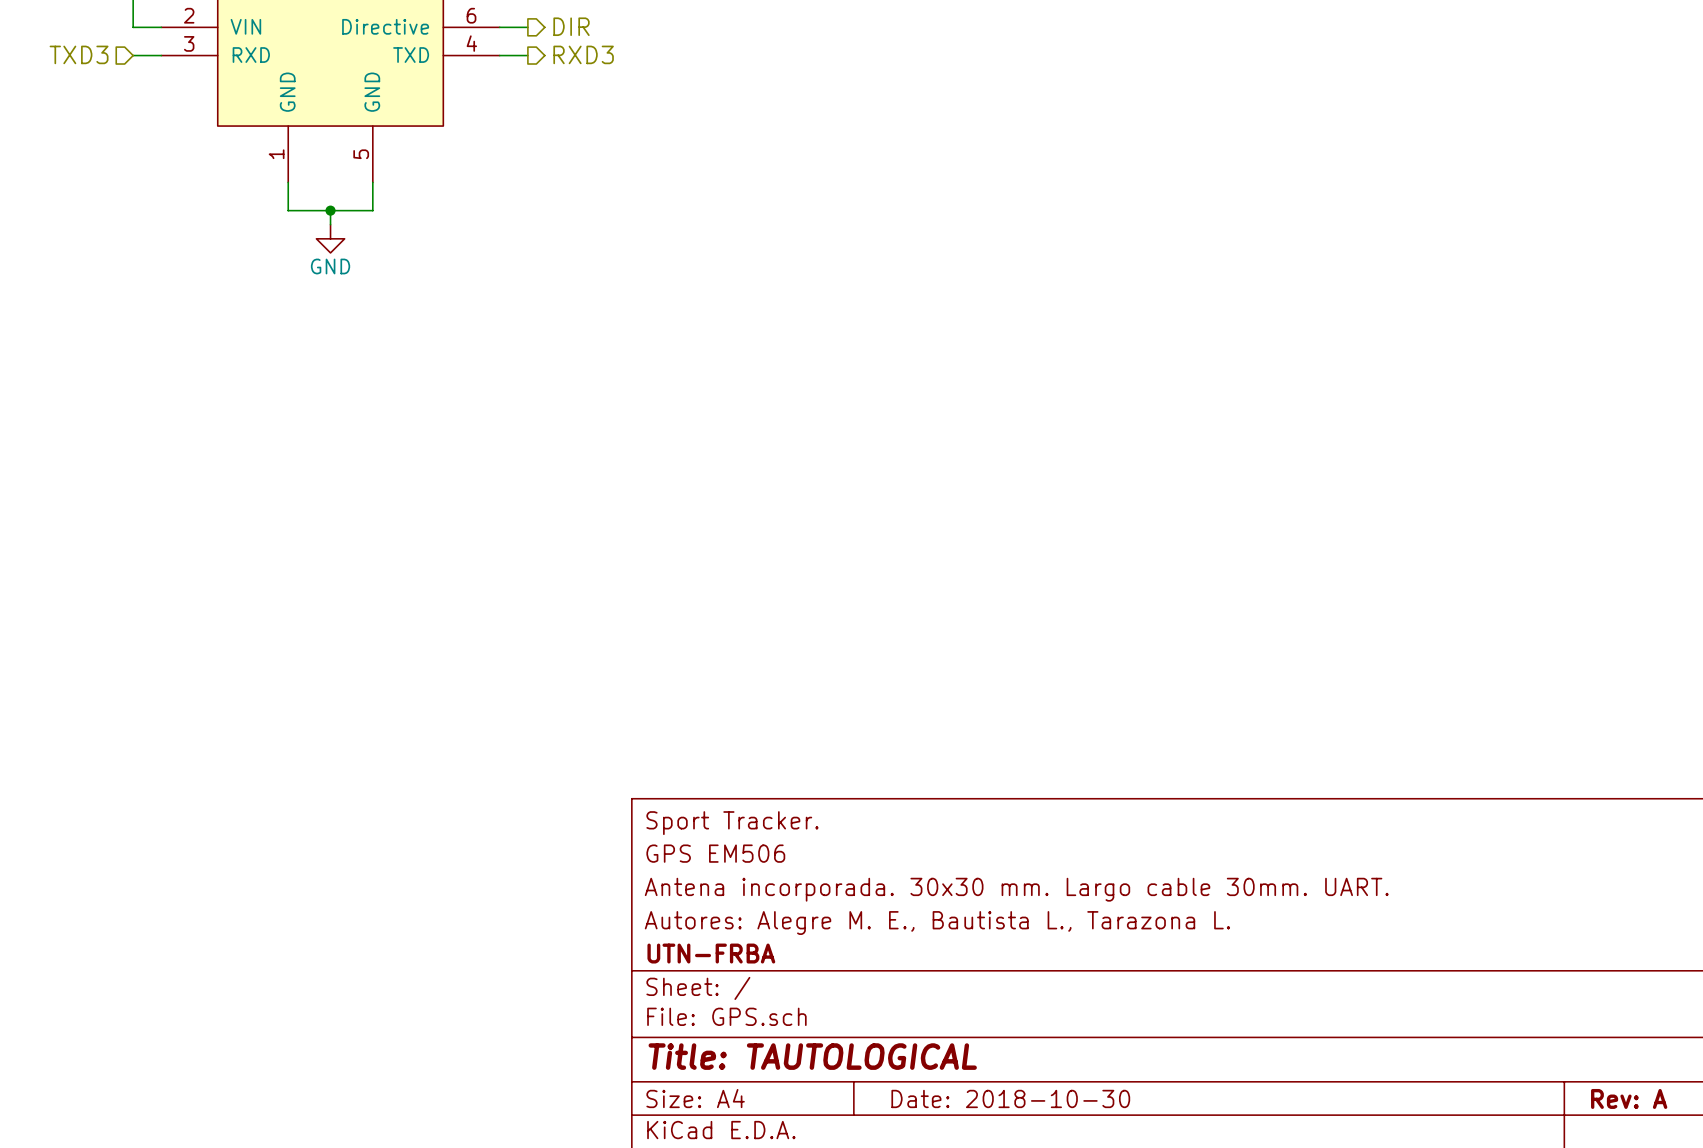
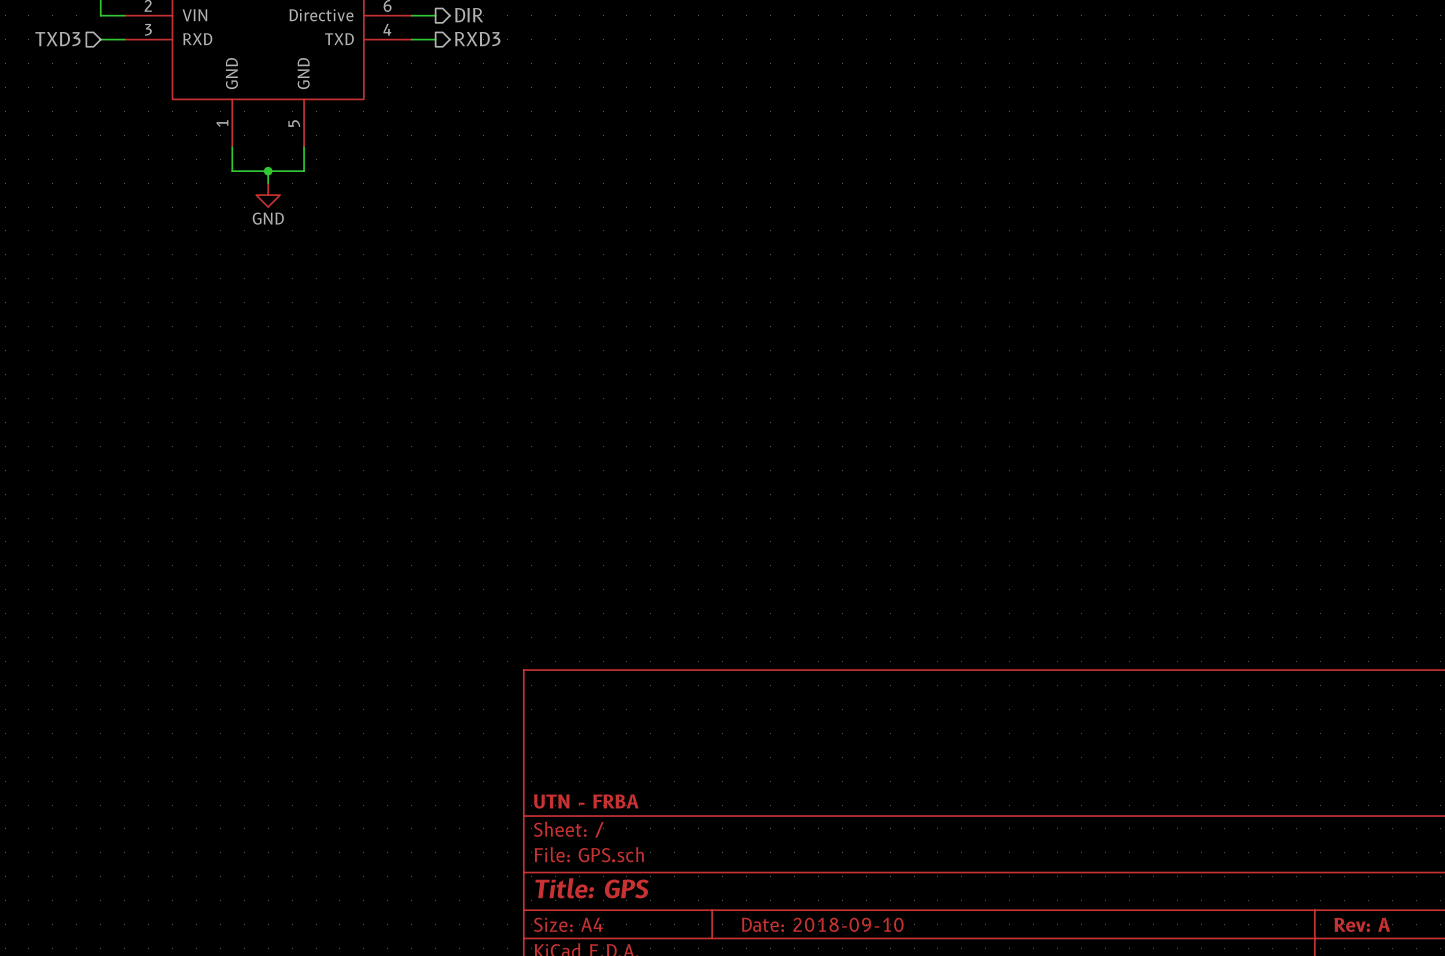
title block: Sport Tracker. (732, 823) -> none
title block: GPS EM506 (715, 853) -> none
title block: Antena incorporada. 30x30 mm. Largo cable 30mm. UART. (1016, 889) -> none
title block: Autores: Alegre M. E., Bautista L., Tarazona L. (937, 923) -> none
title block: UTN-FRBA (711, 953) -> UTN - FRBA (586, 801)
title block: Title: TAUTOLOGICAL (812, 1056) -> Title: GPS (592, 888)
title block: Date: 2018-10-30 (1010, 1098) -> Date: 2018-09-10 (822, 924)

